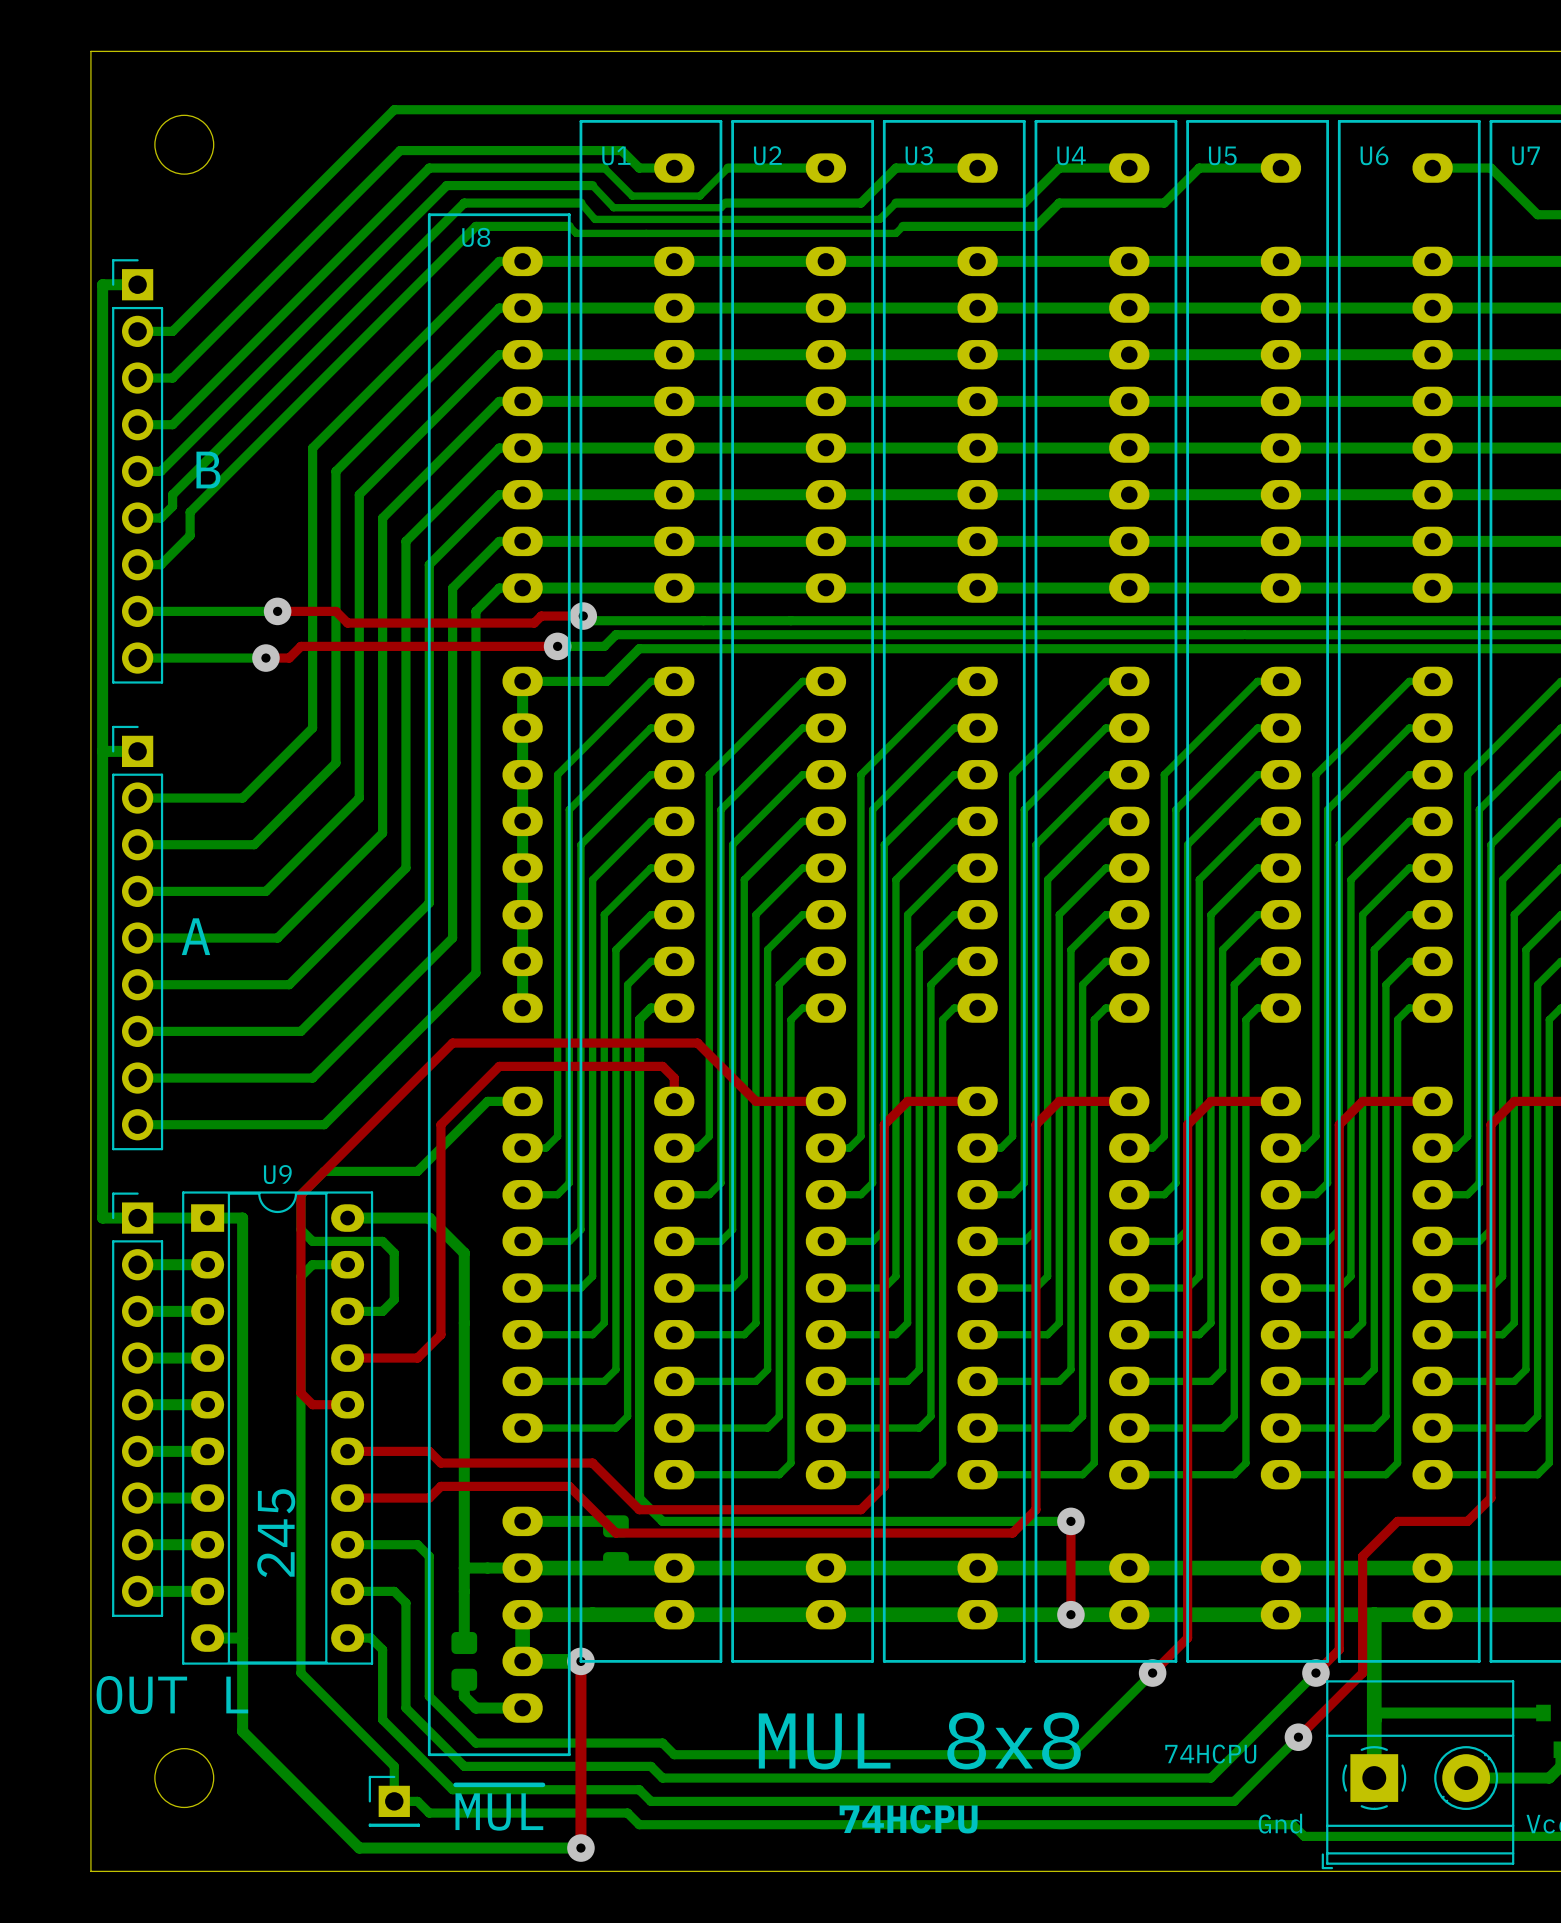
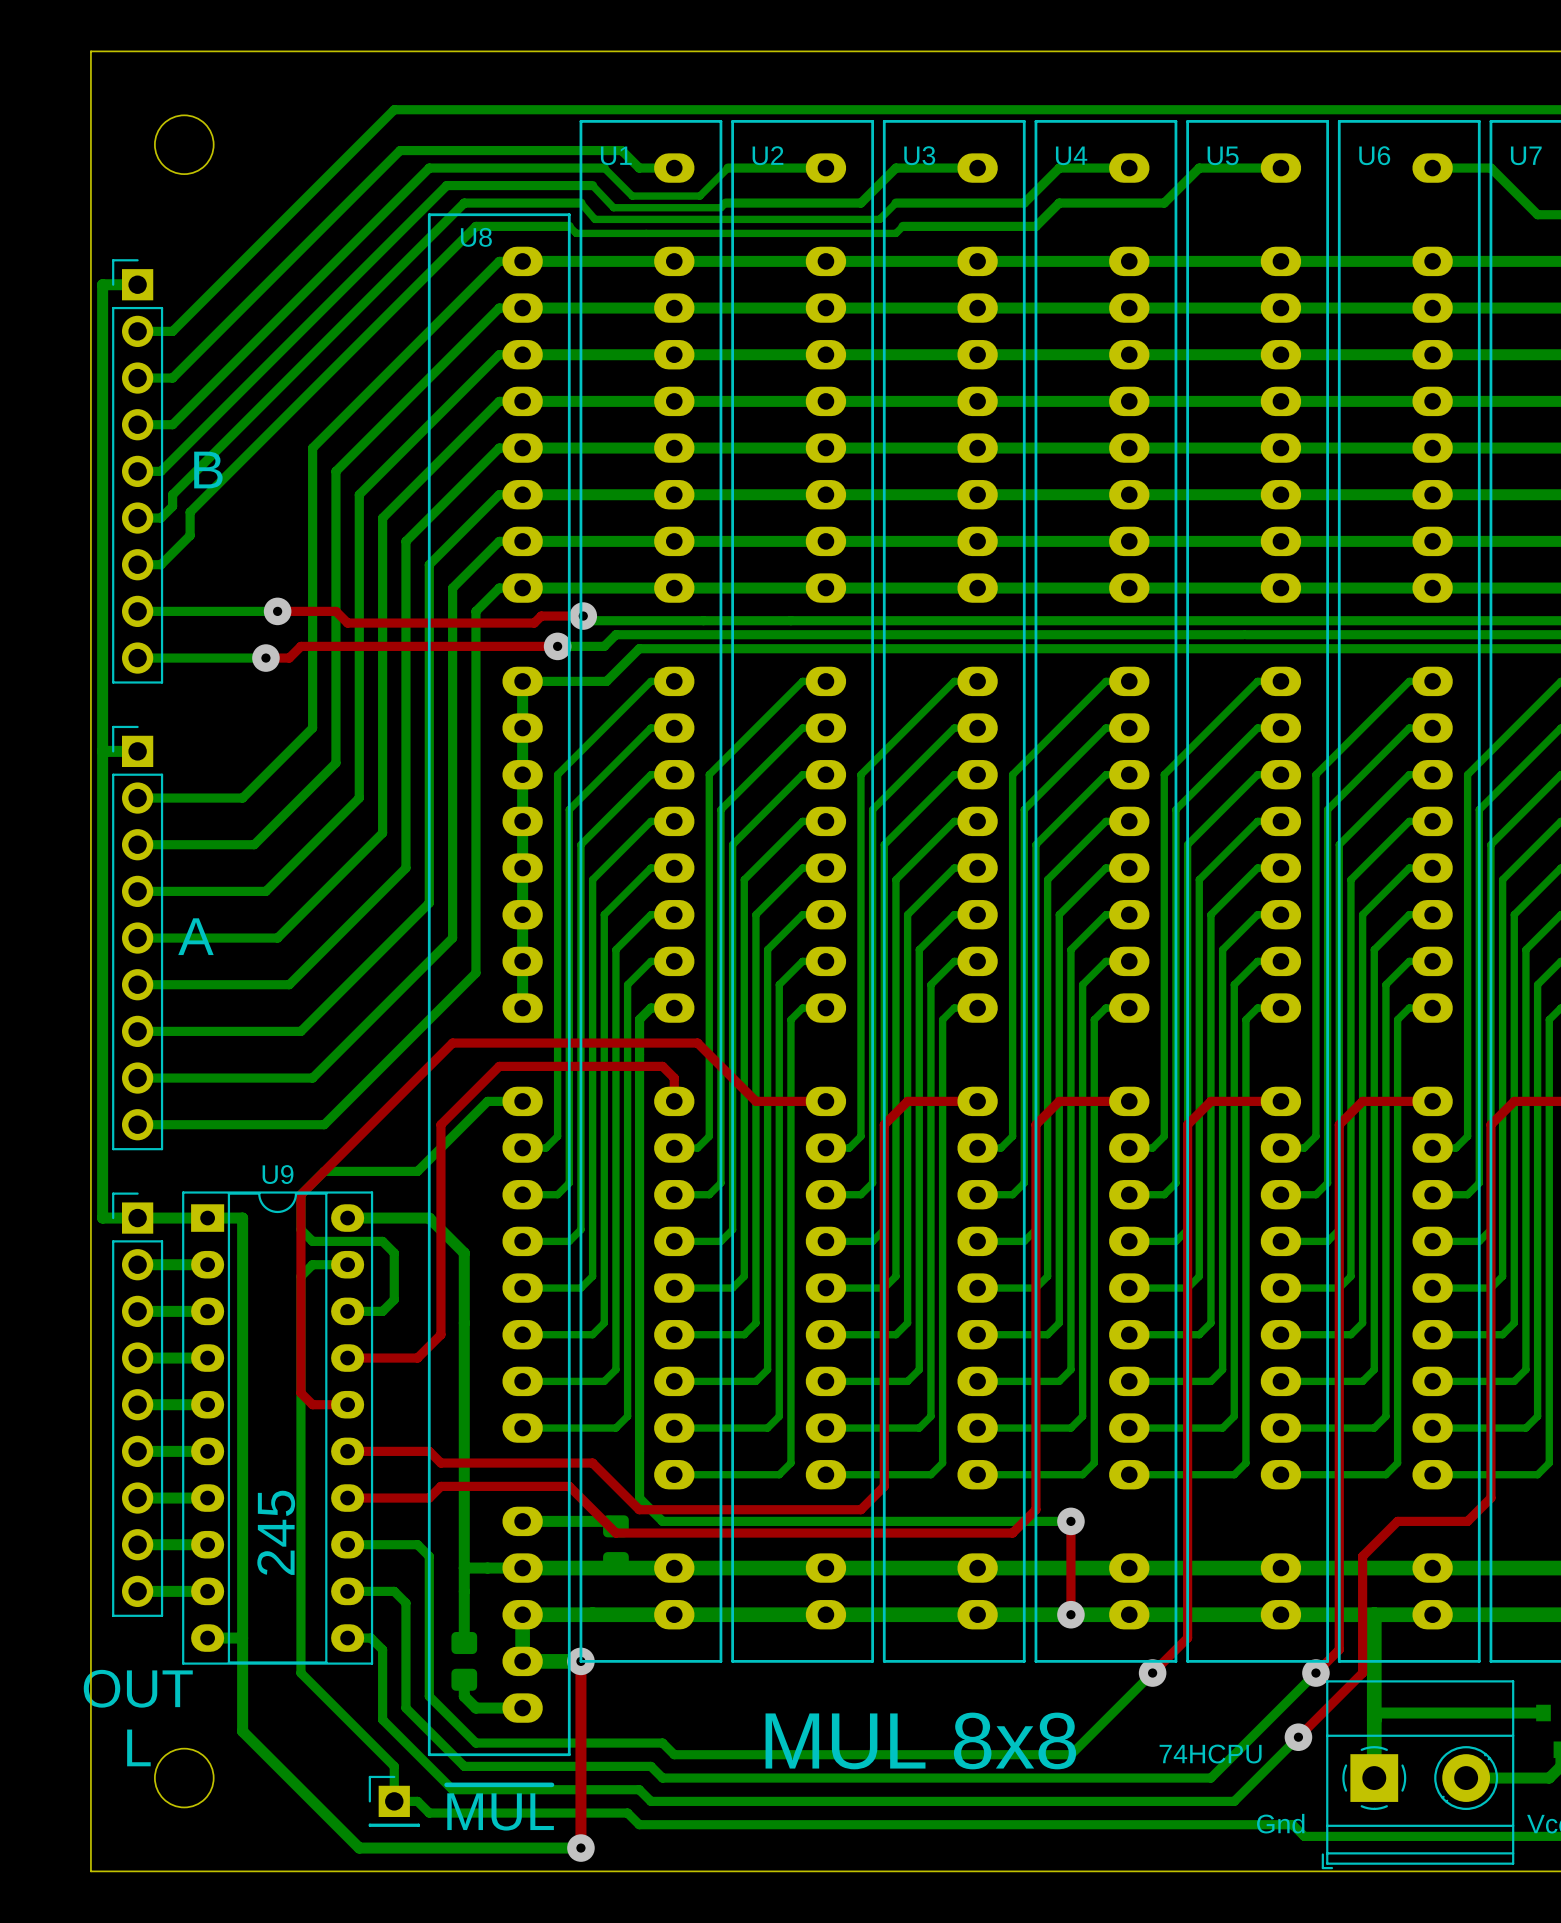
text: OUT L (172, 1695) -> OUT (138, 1688)
text: none -> L (138, 1747)
text: 74HCPU (908, 1819) -> none

